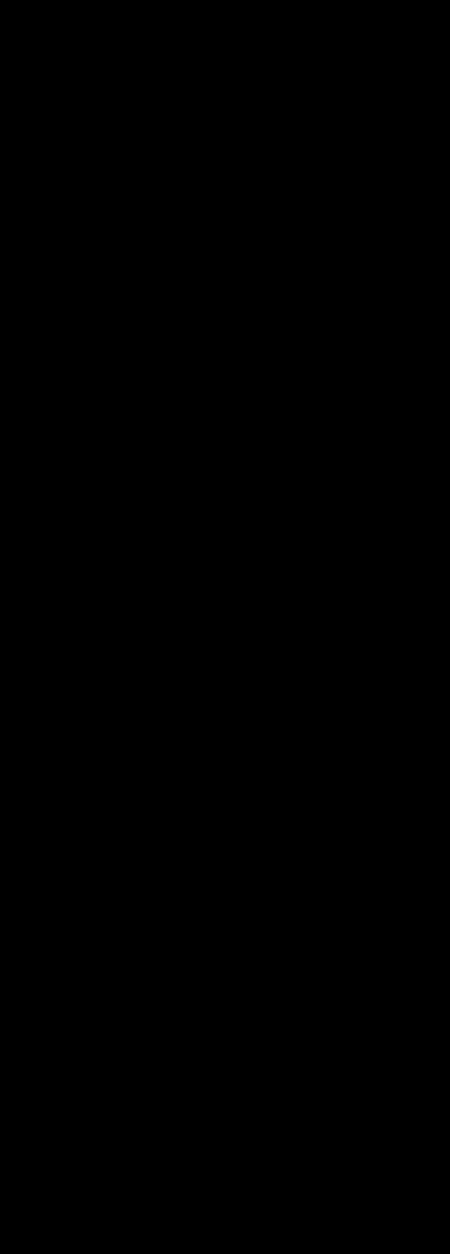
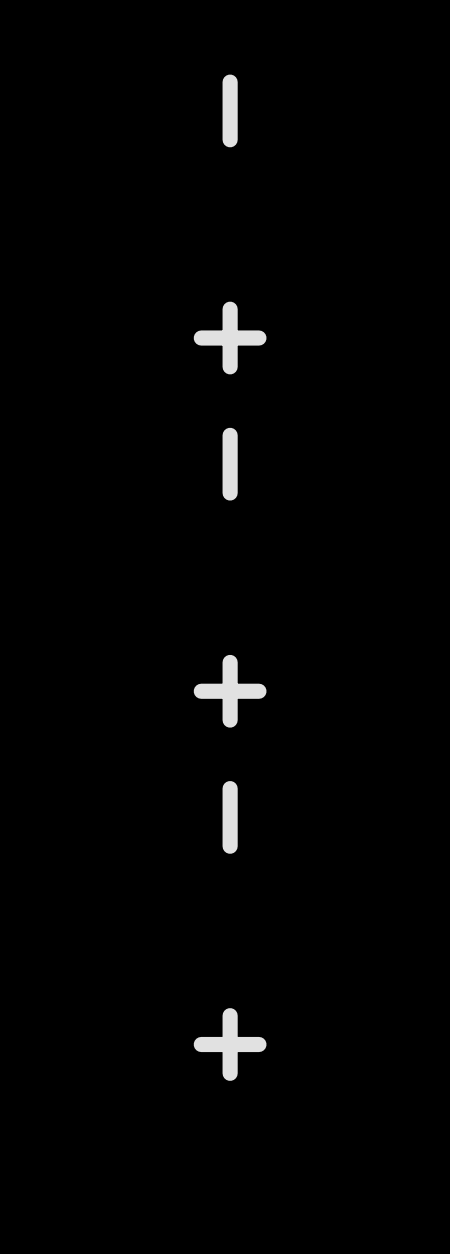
text: none -> - (230, 110)
text: none -> + (230, 338)
text: none -> - (230, 464)
text: none -> + (230, 691)
text: none -> - (230, 817)
text: none -> + (230, 1044)

